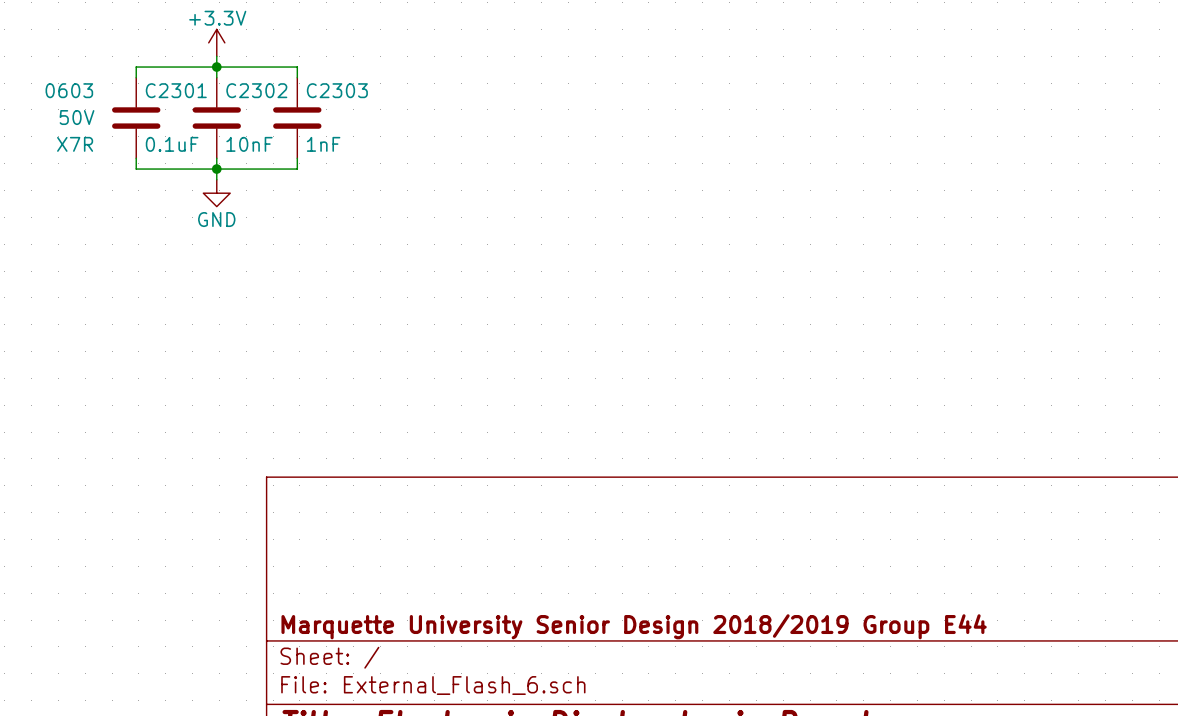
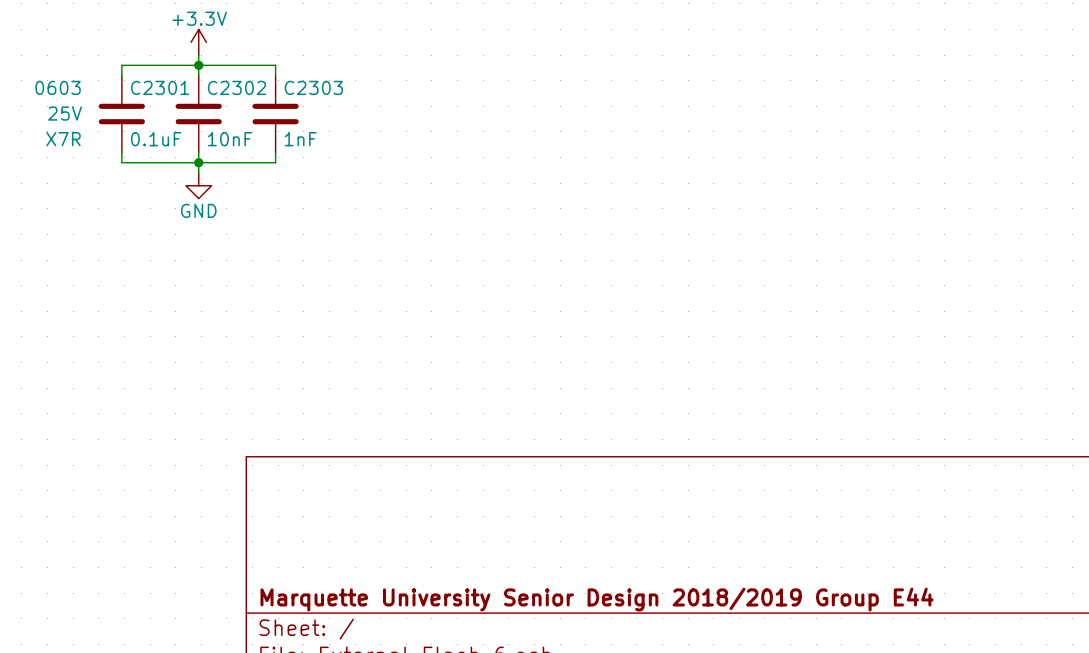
C2301 text: 50V (77, 117) -> 25V (65, 113)

